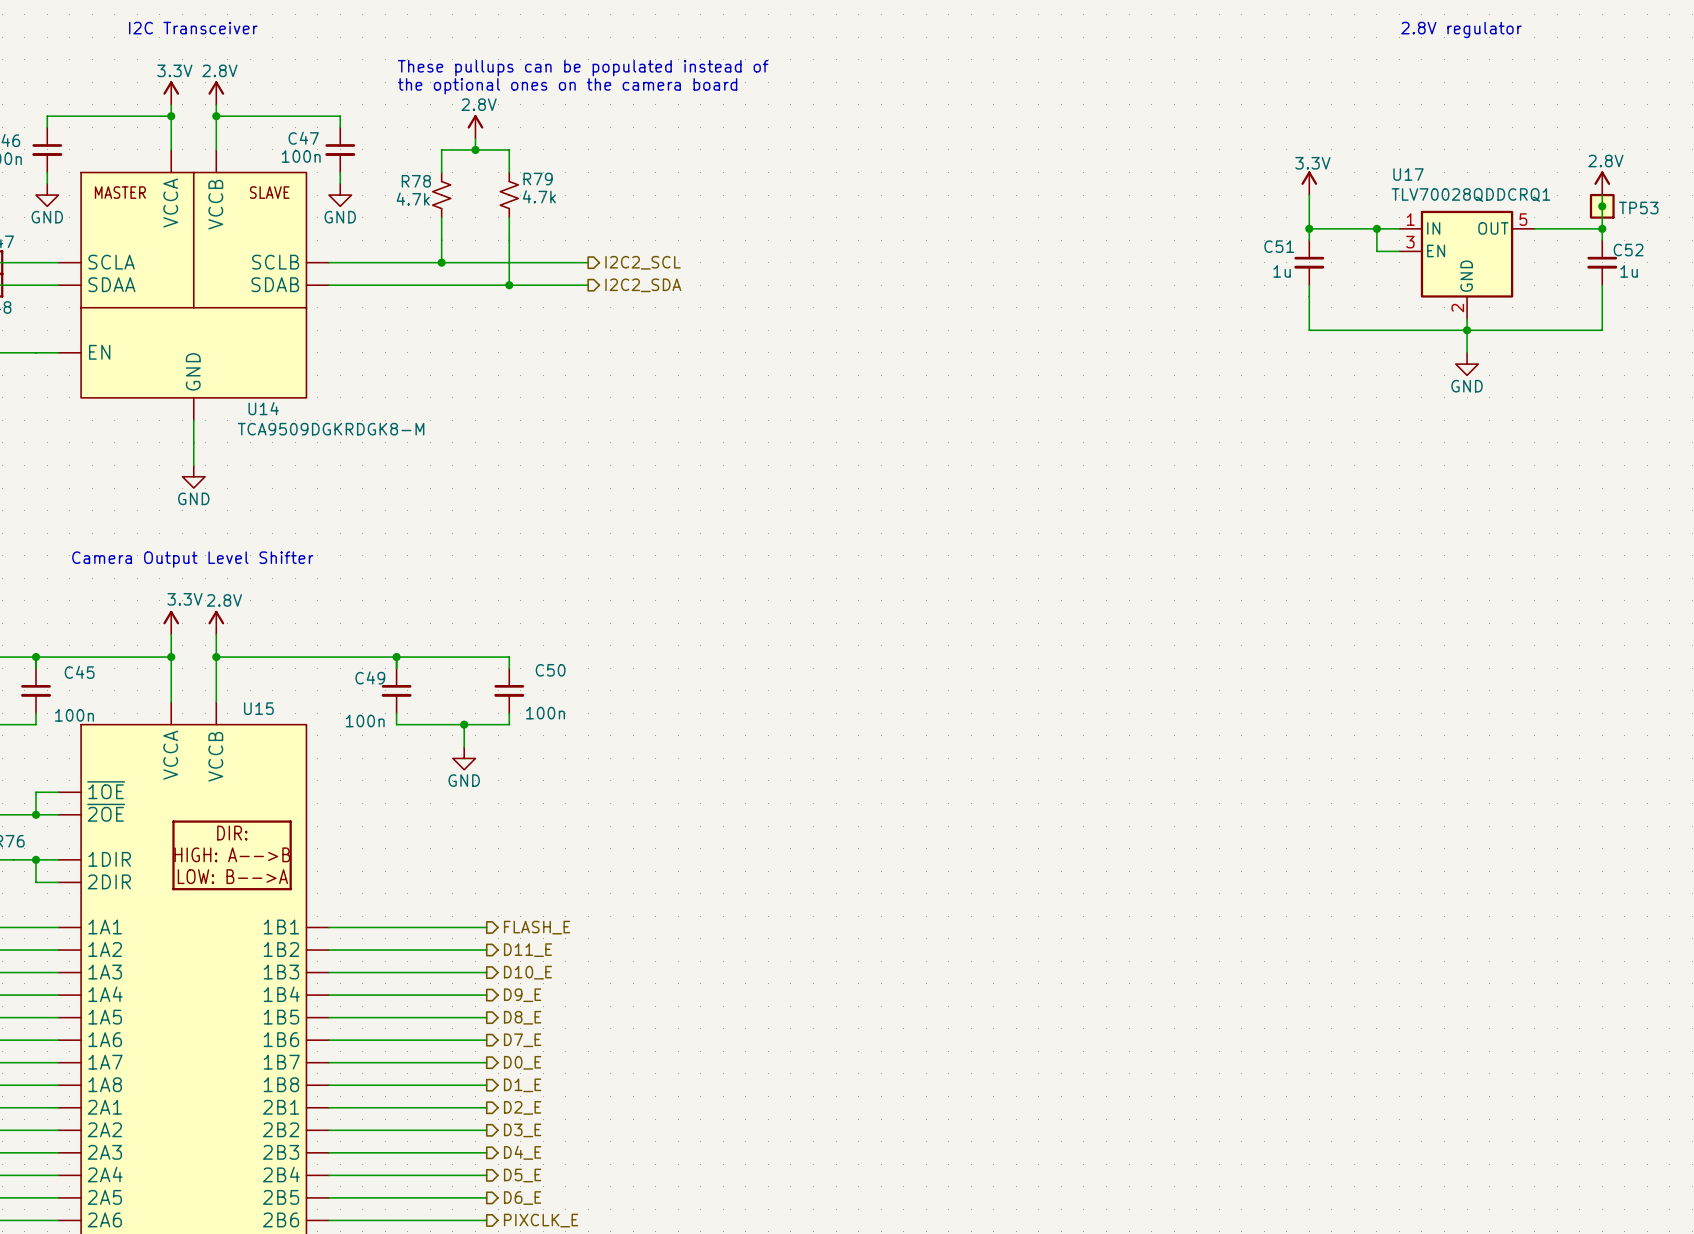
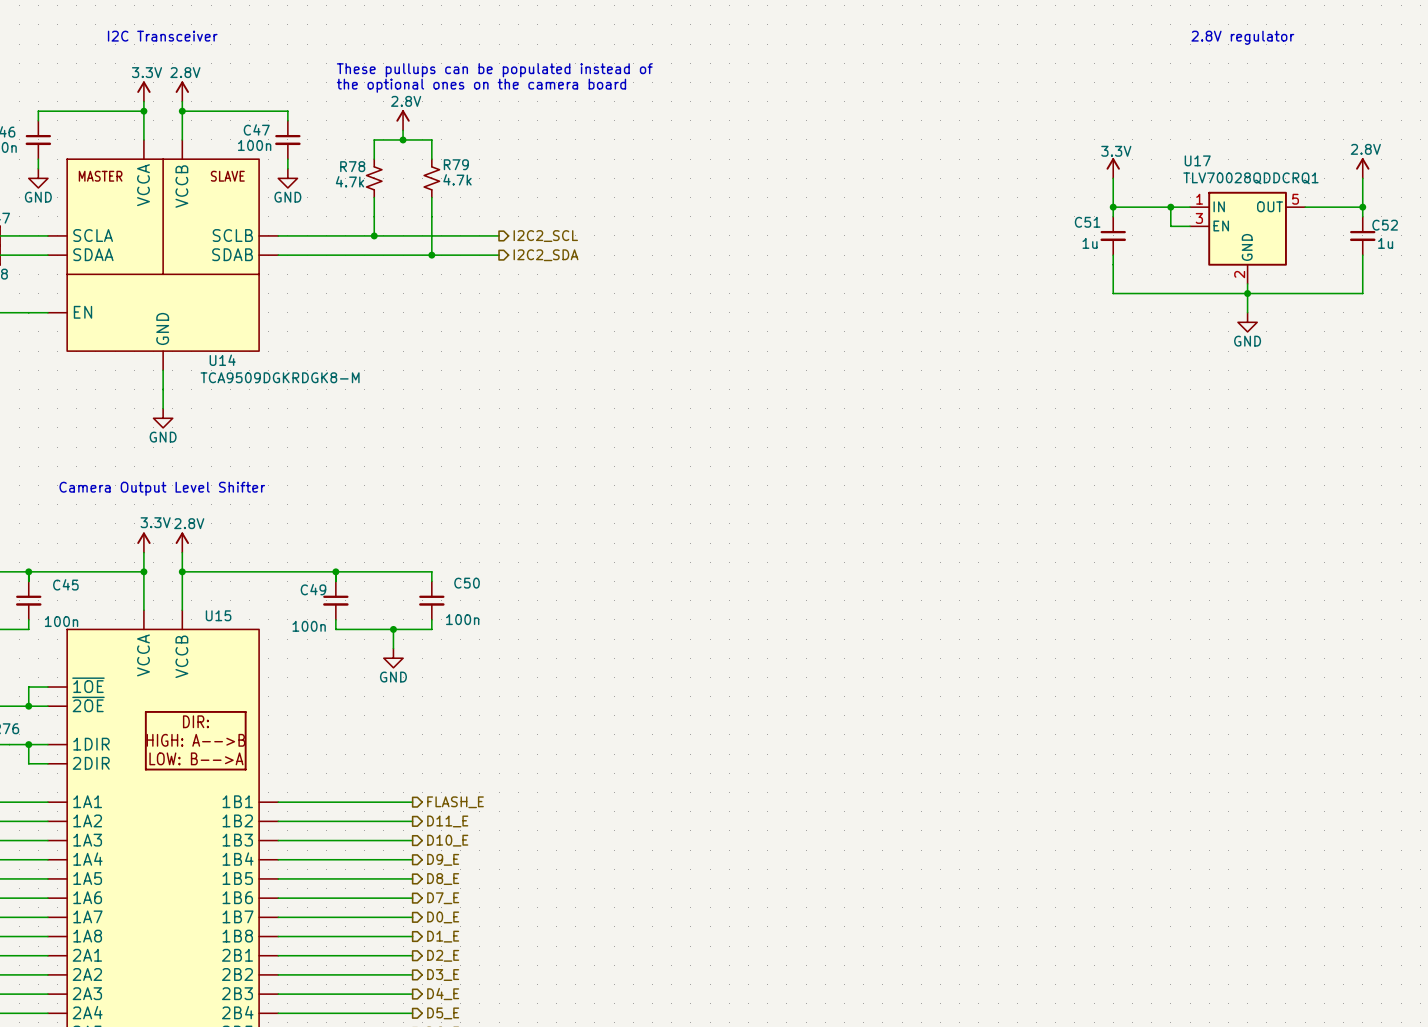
junction: (1602, 206) -> none
TP53: (1602, 206) -> none

